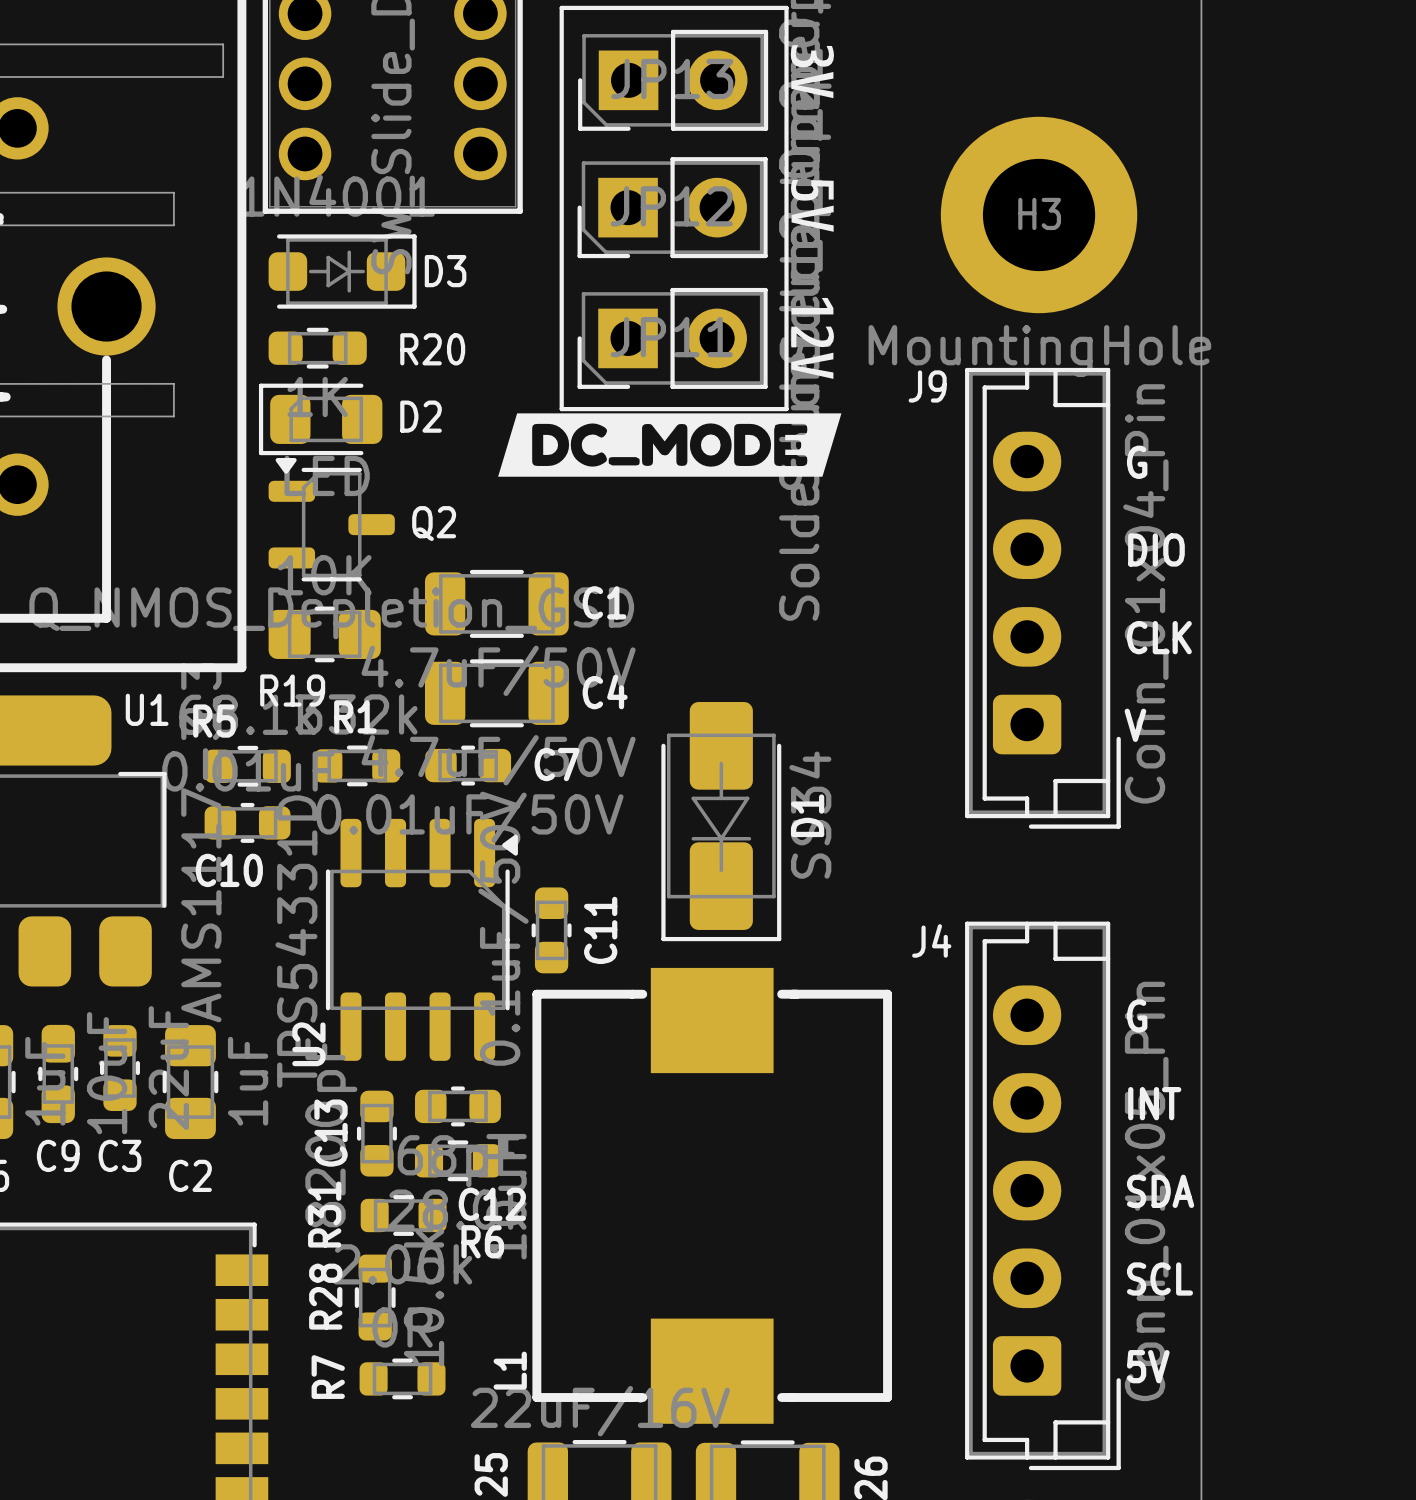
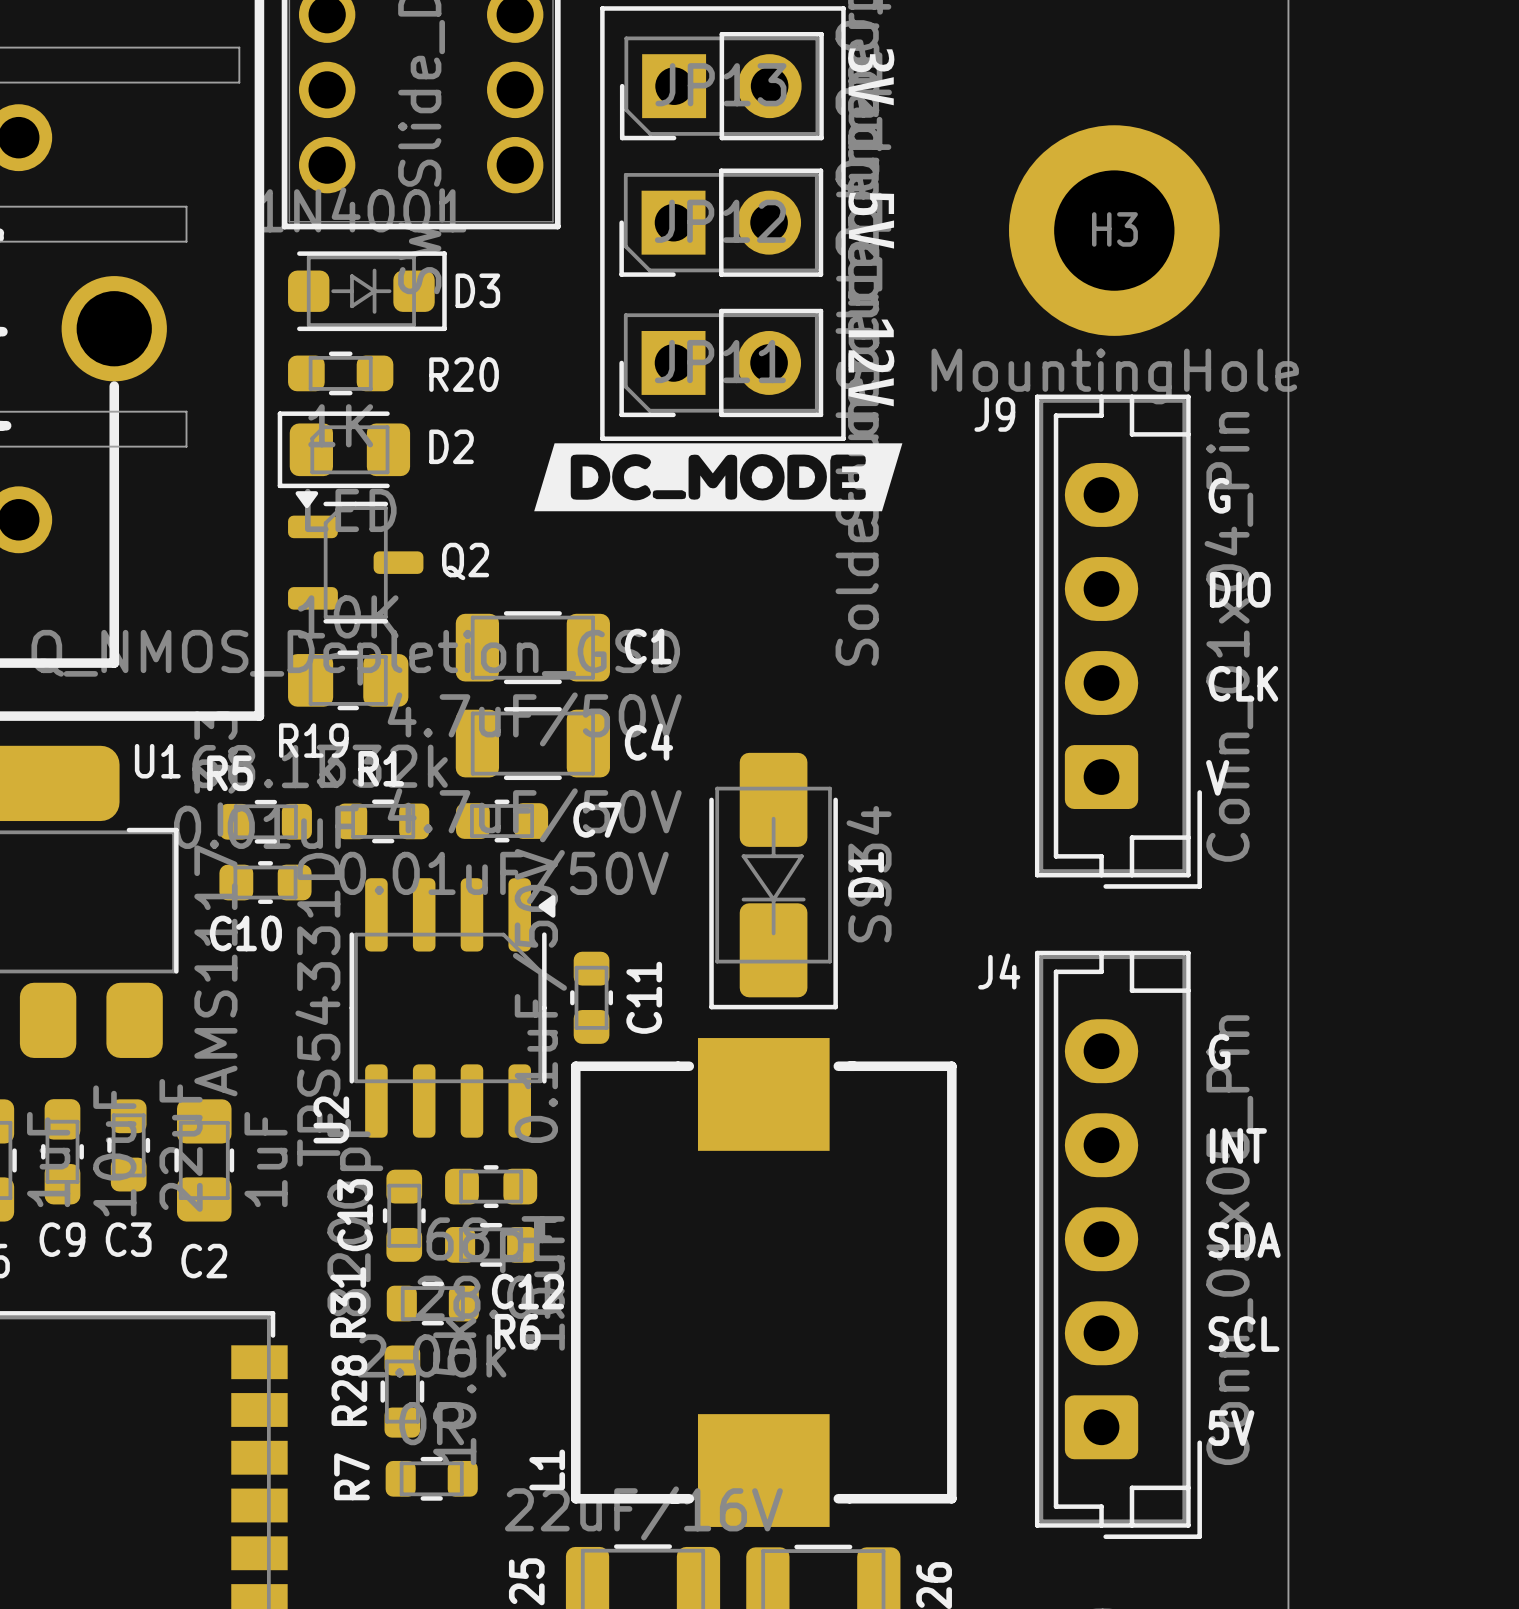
text position: G (1137, 1015) -> G (1219, 1051)
text position: INT (1154, 1103) -> INT (1238, 1146)
text position: SDA (1160, 1191) -> SDA (1244, 1240)
J4 position: (1042, 1195) -> (1118, 1244)
text position: SCL (1159, 1279) -> SCL (1244, 1334)
text position: 5V (1148, 1366) -> 5V (1231, 1428)

